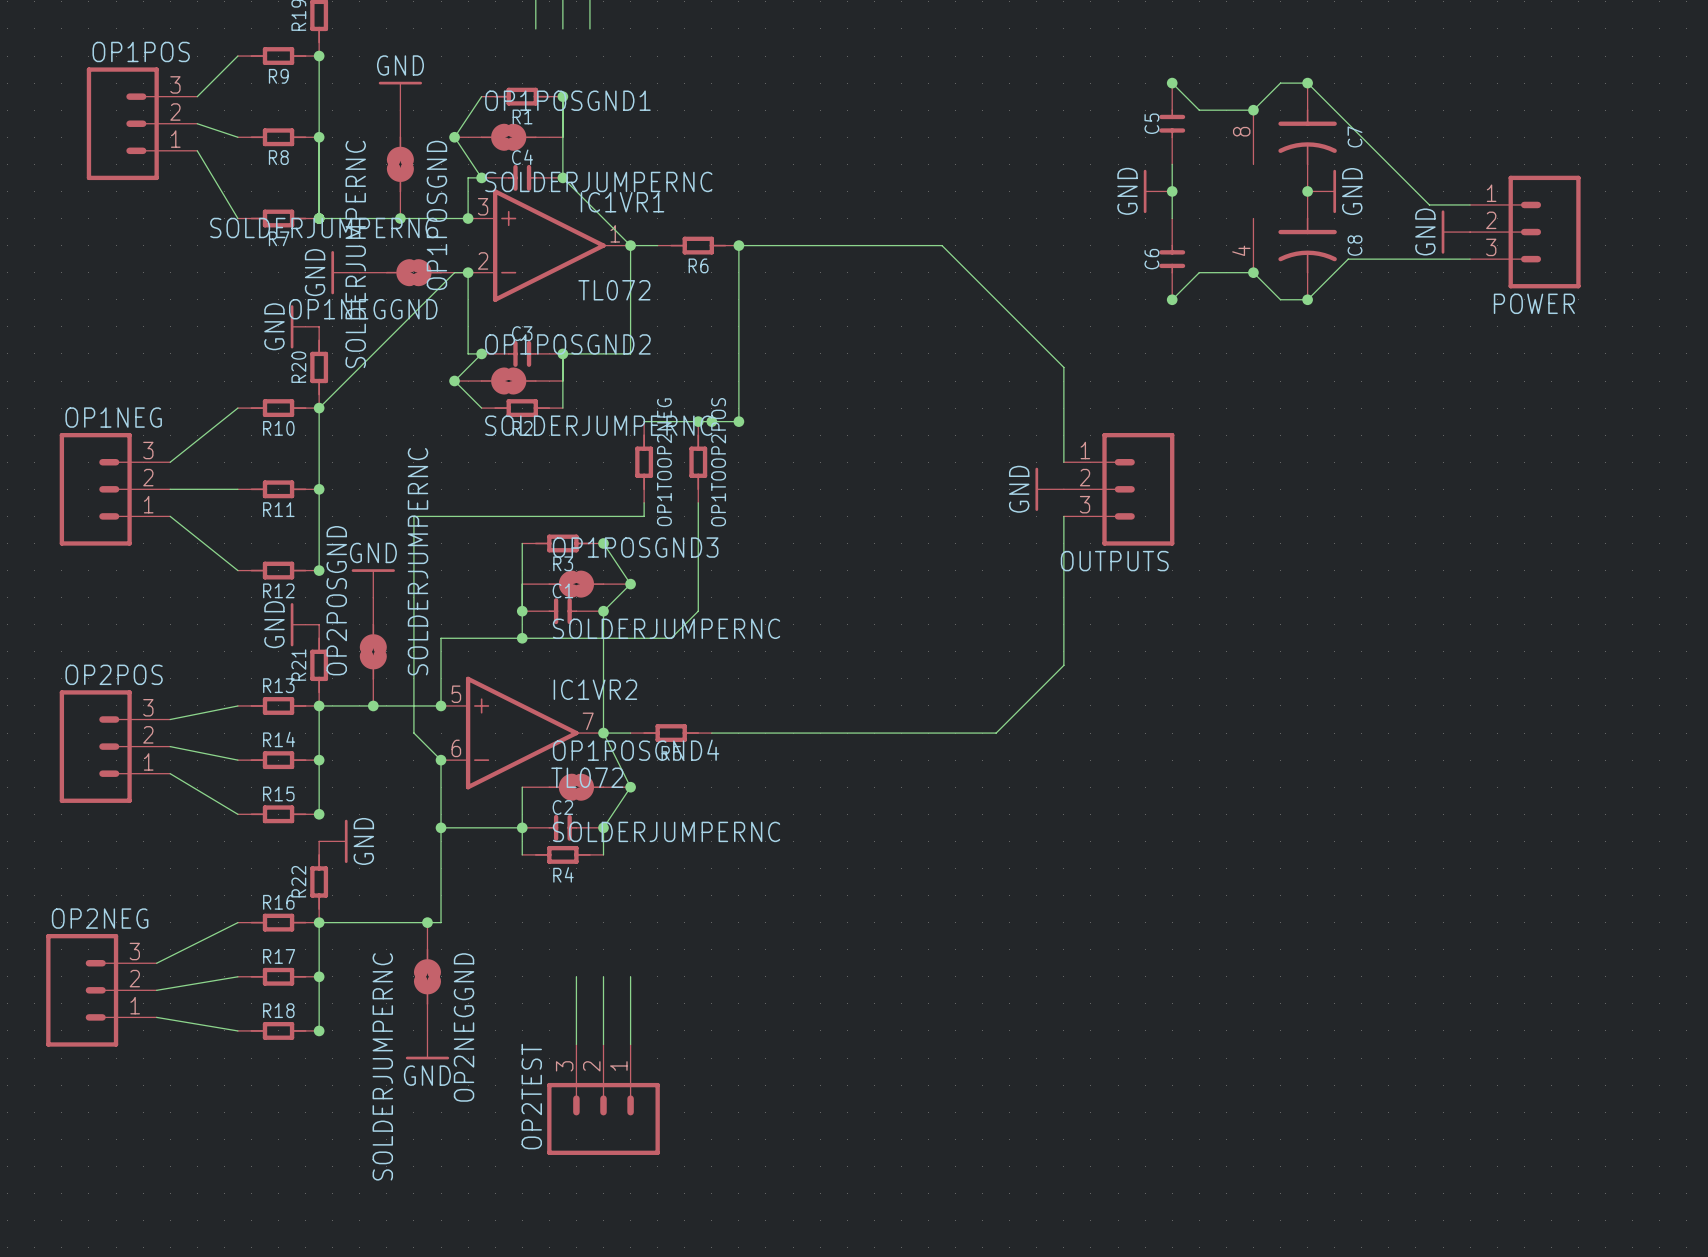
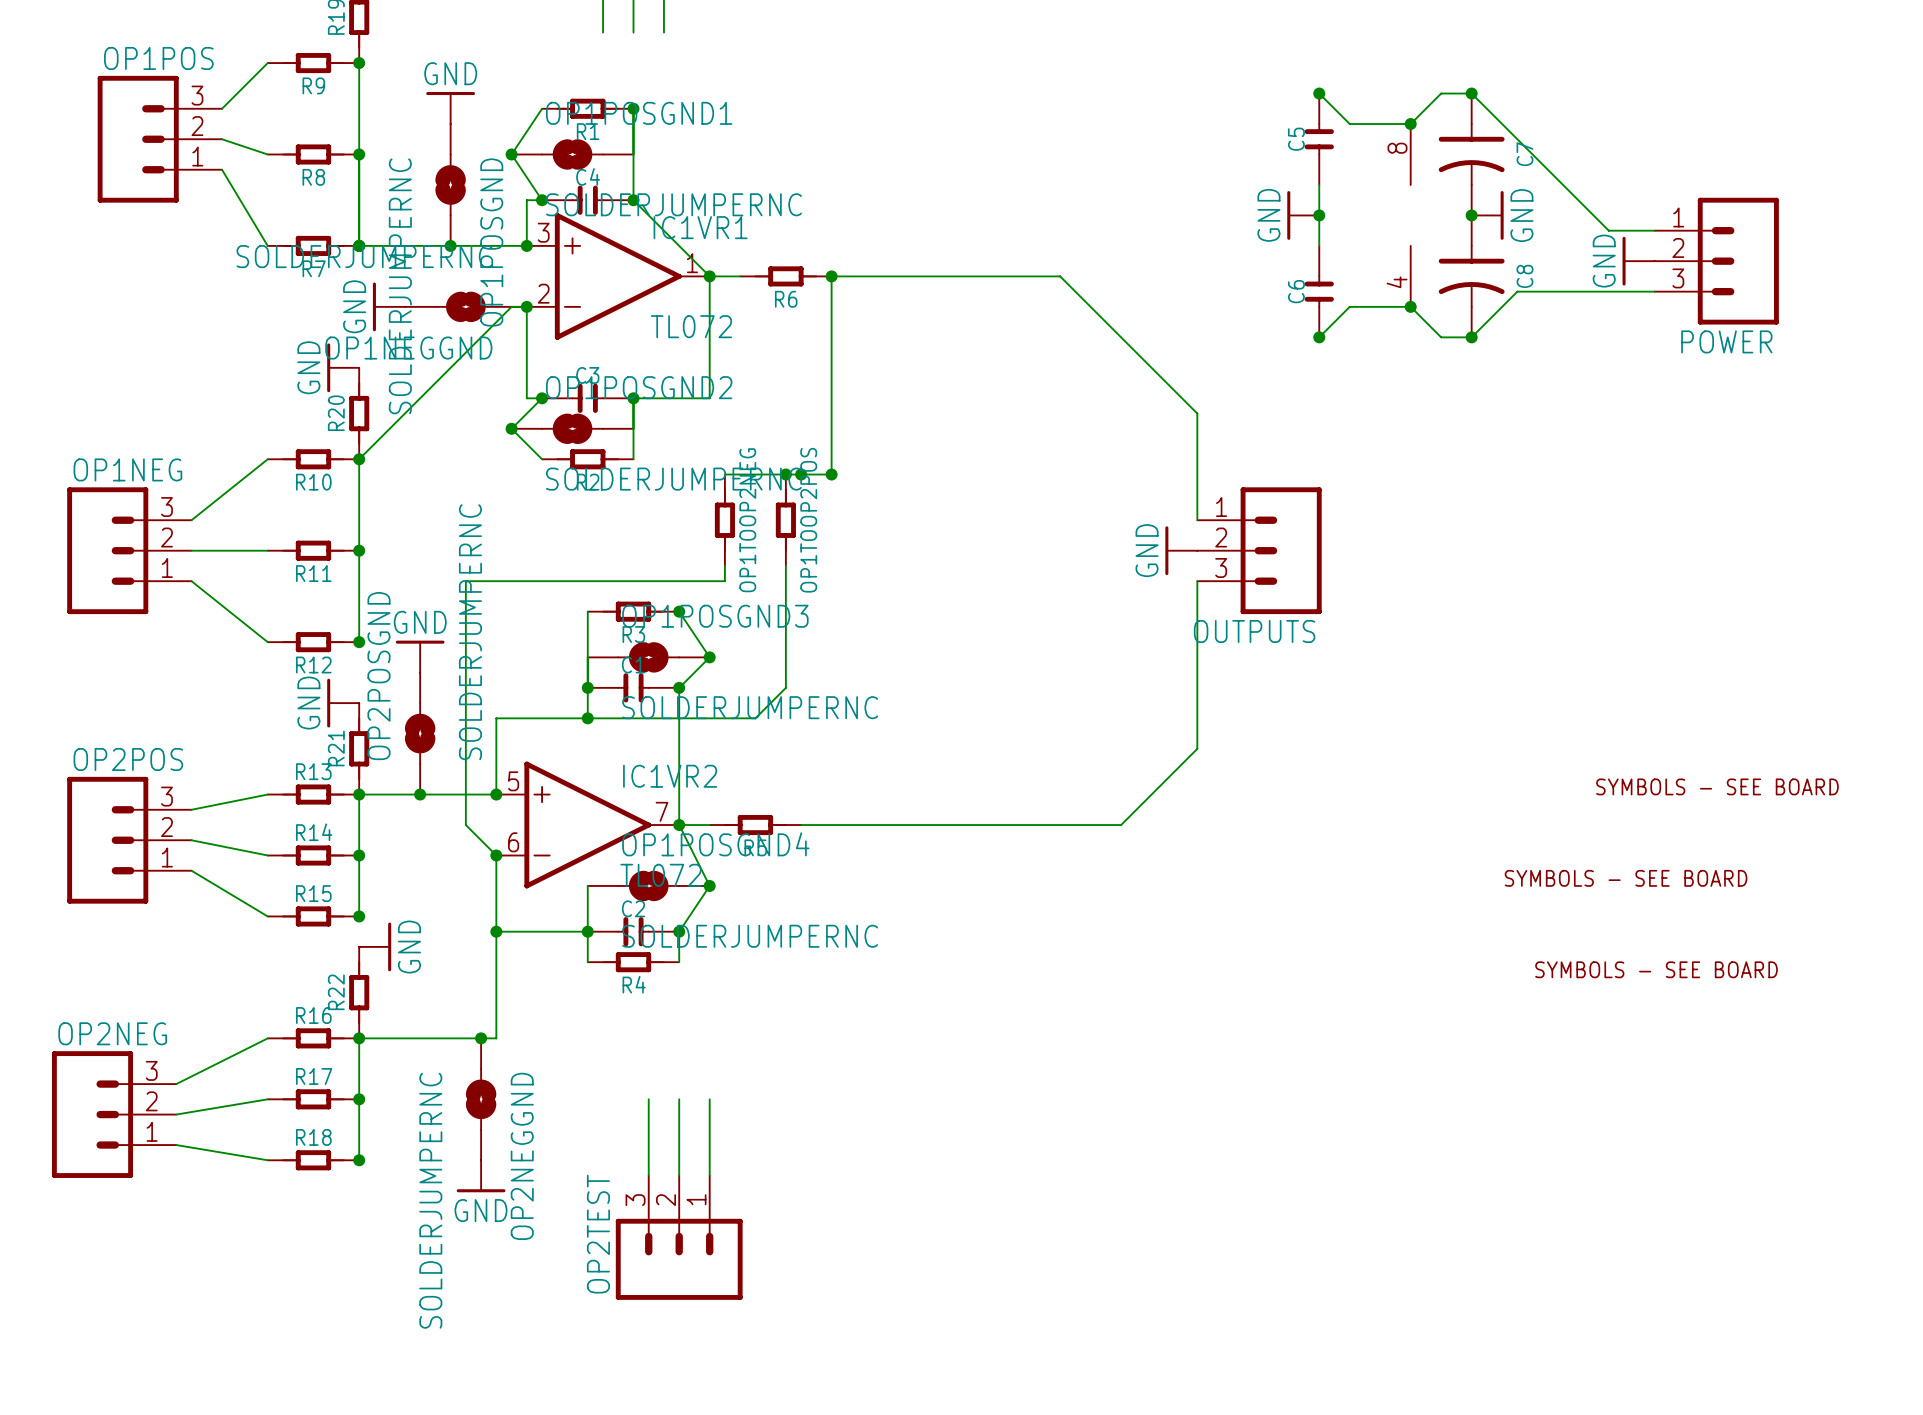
part: none -> (1717, 786)
part: none -> (1626, 878)
part: none -> (1656, 969)

